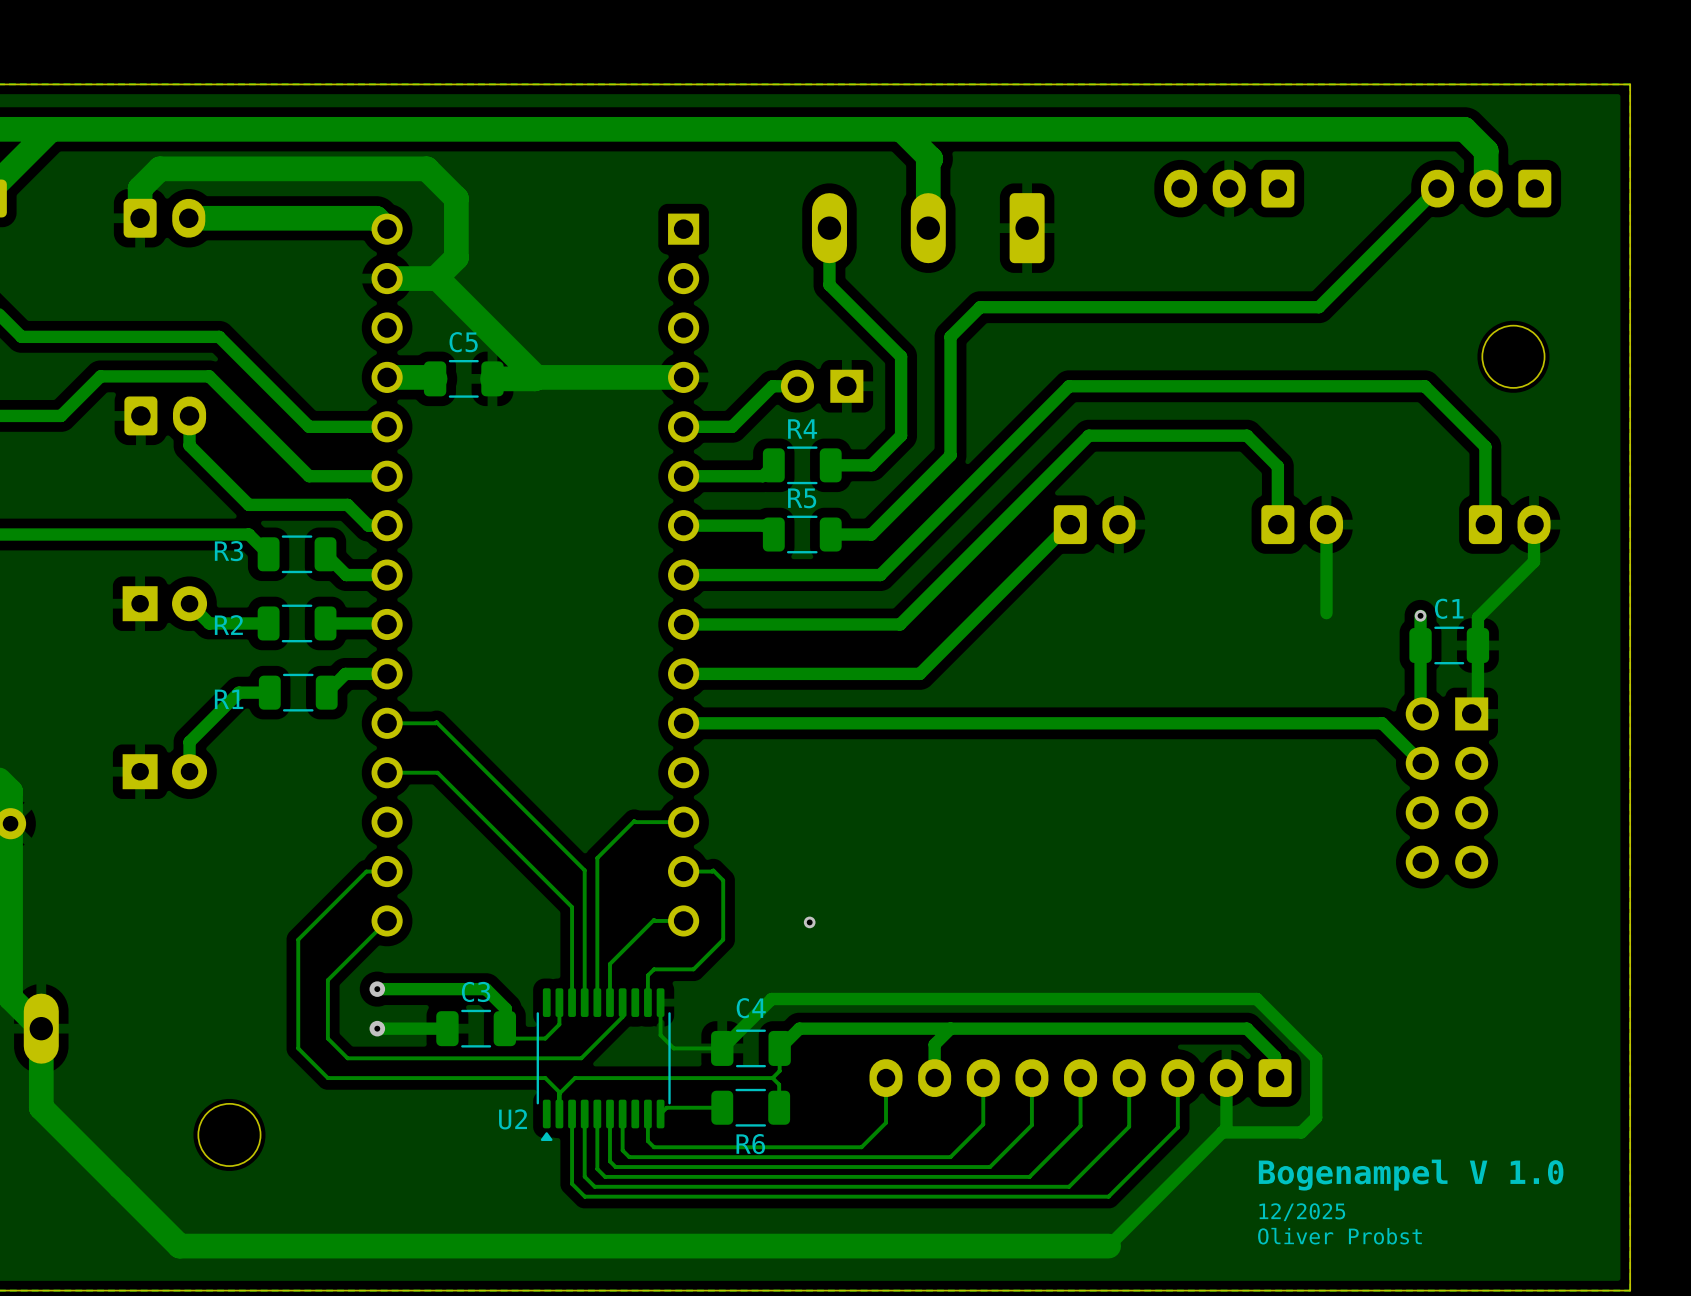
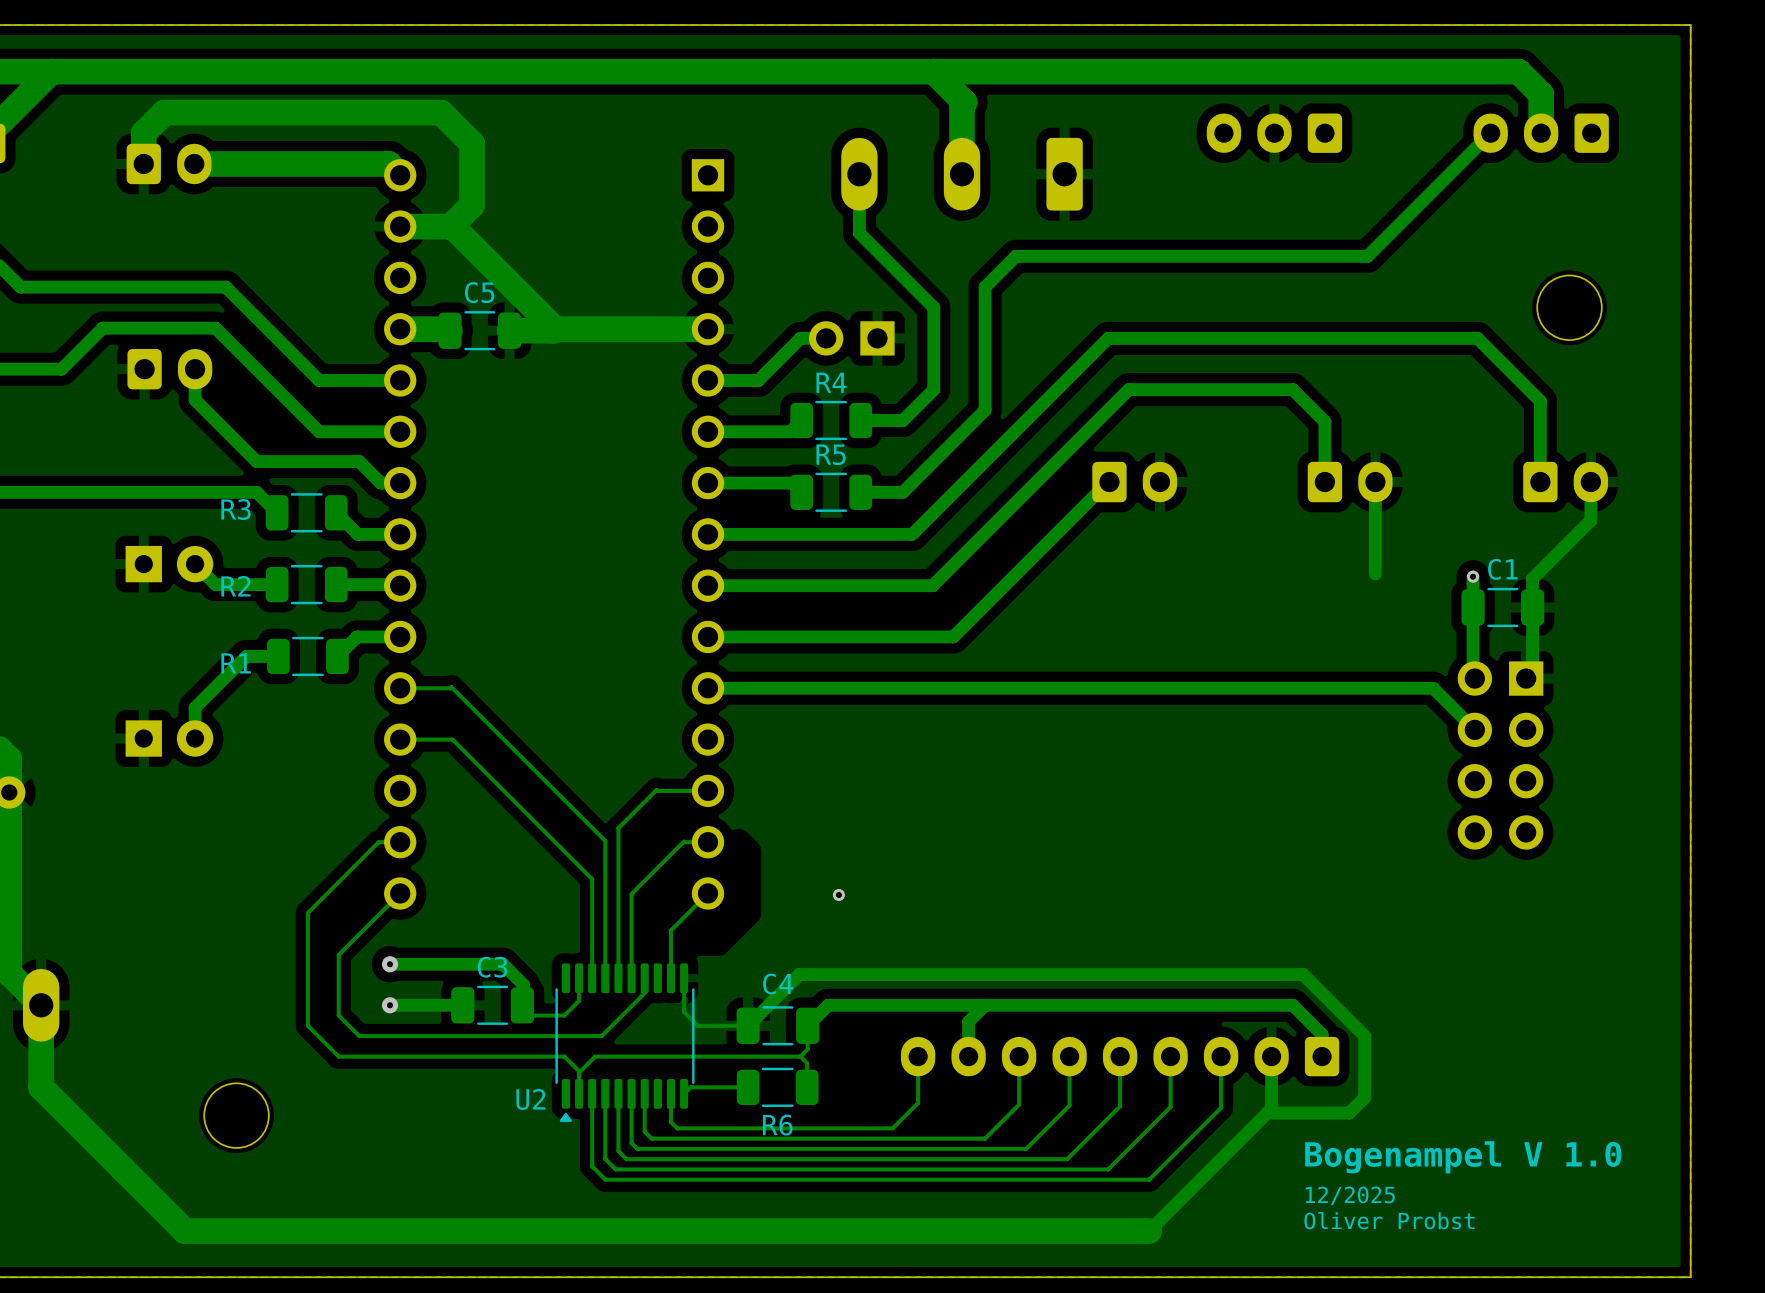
track: (683, 871) (713, 870) (723, 880) (723, 939) (693, 969) (654, 969) (647, 975) -> (708, 842) (683, 841) (631, 894) (631, 938)
track: (683, 920) (654, 919) (609, 963) -> (708, 893) (670, 930) (670, 950)

